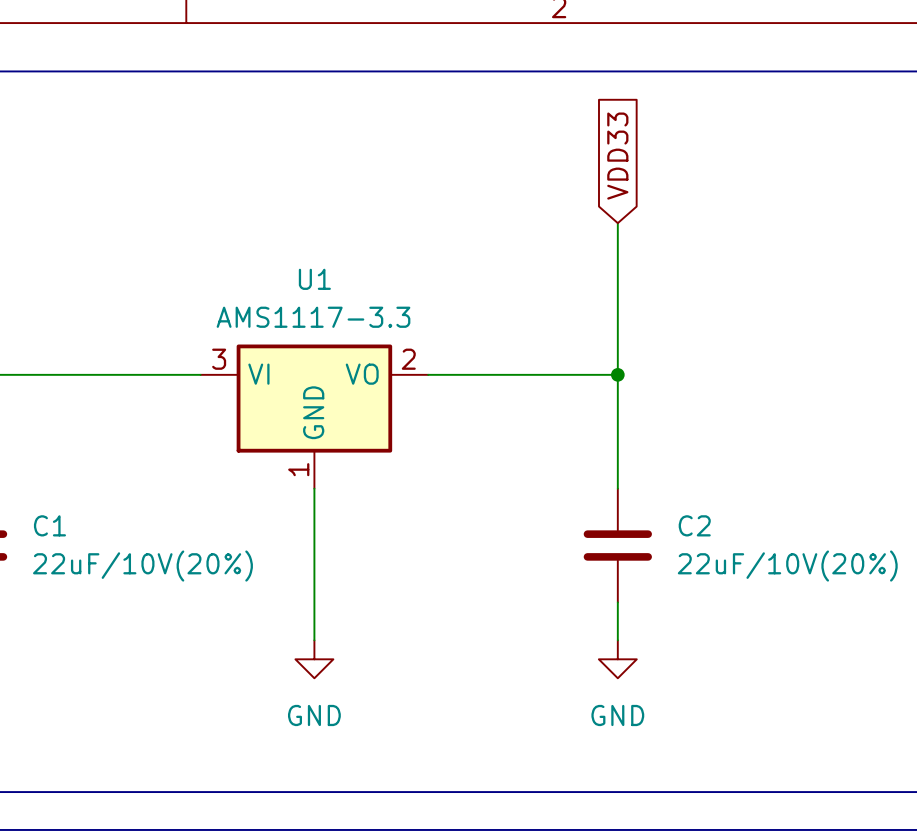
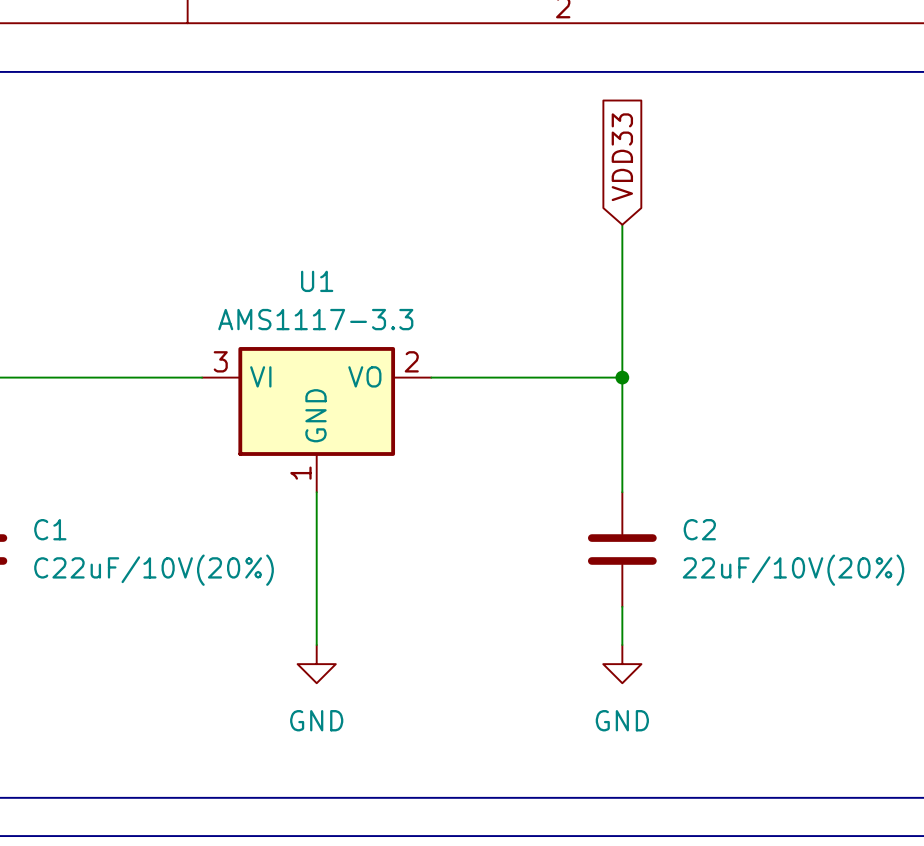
C1 value: 22uF/10V(20%) (142, 566) -> C22uF/10V(20%) (154, 570)

